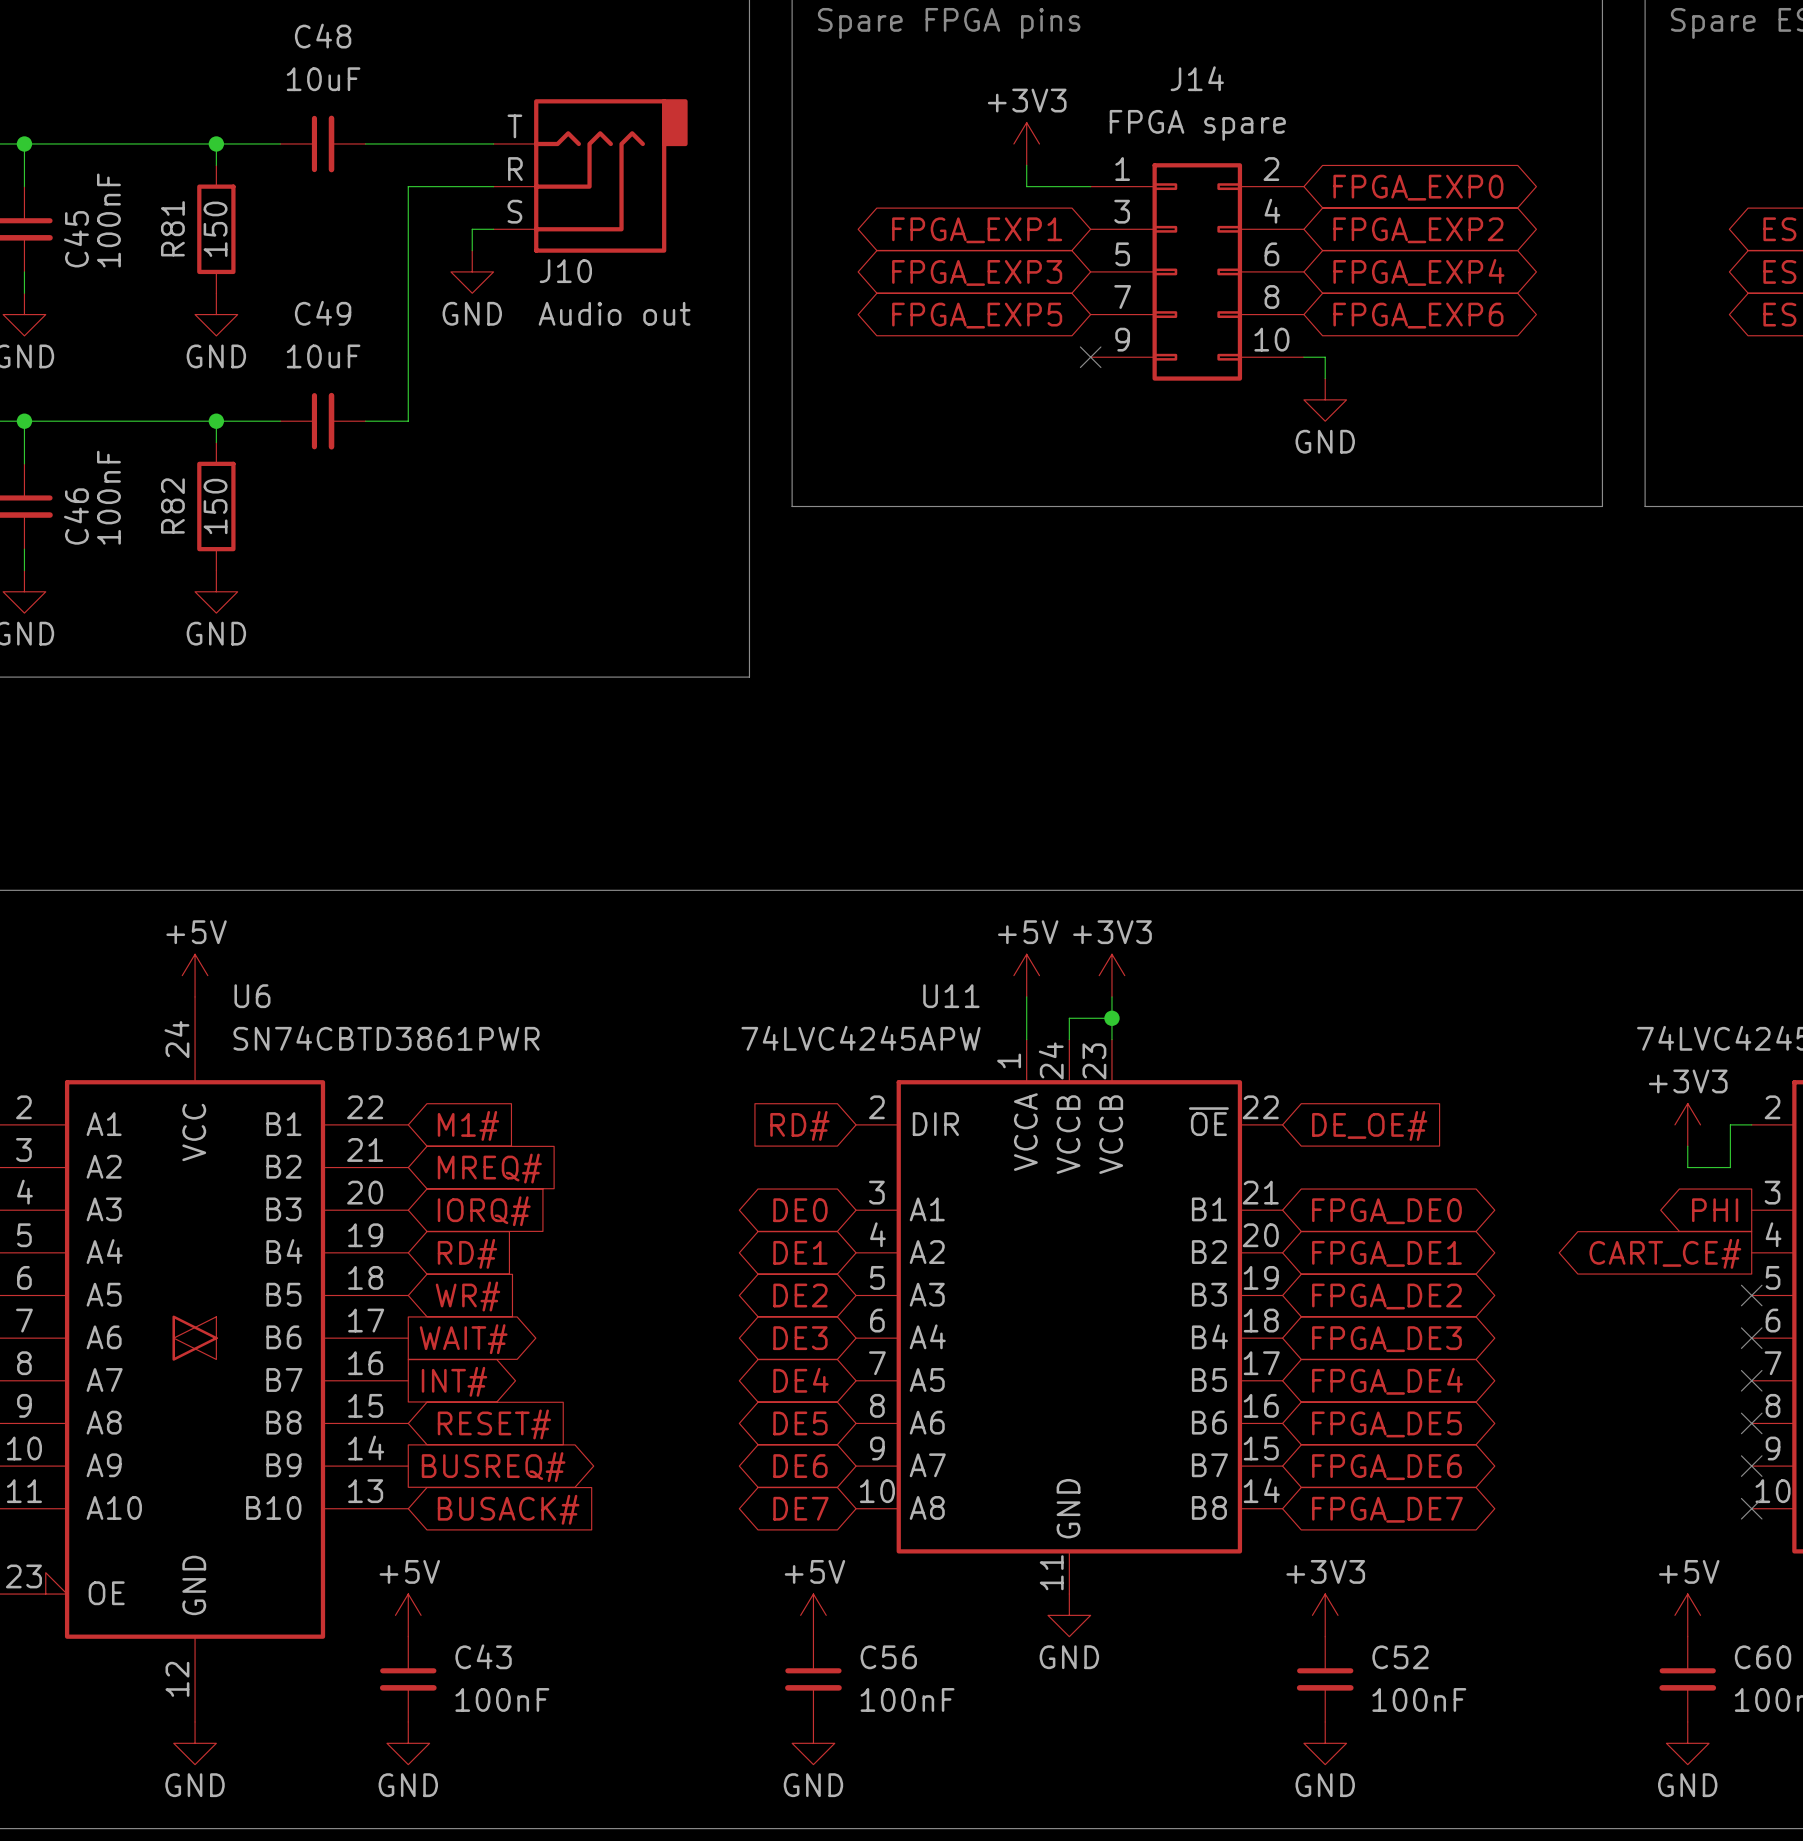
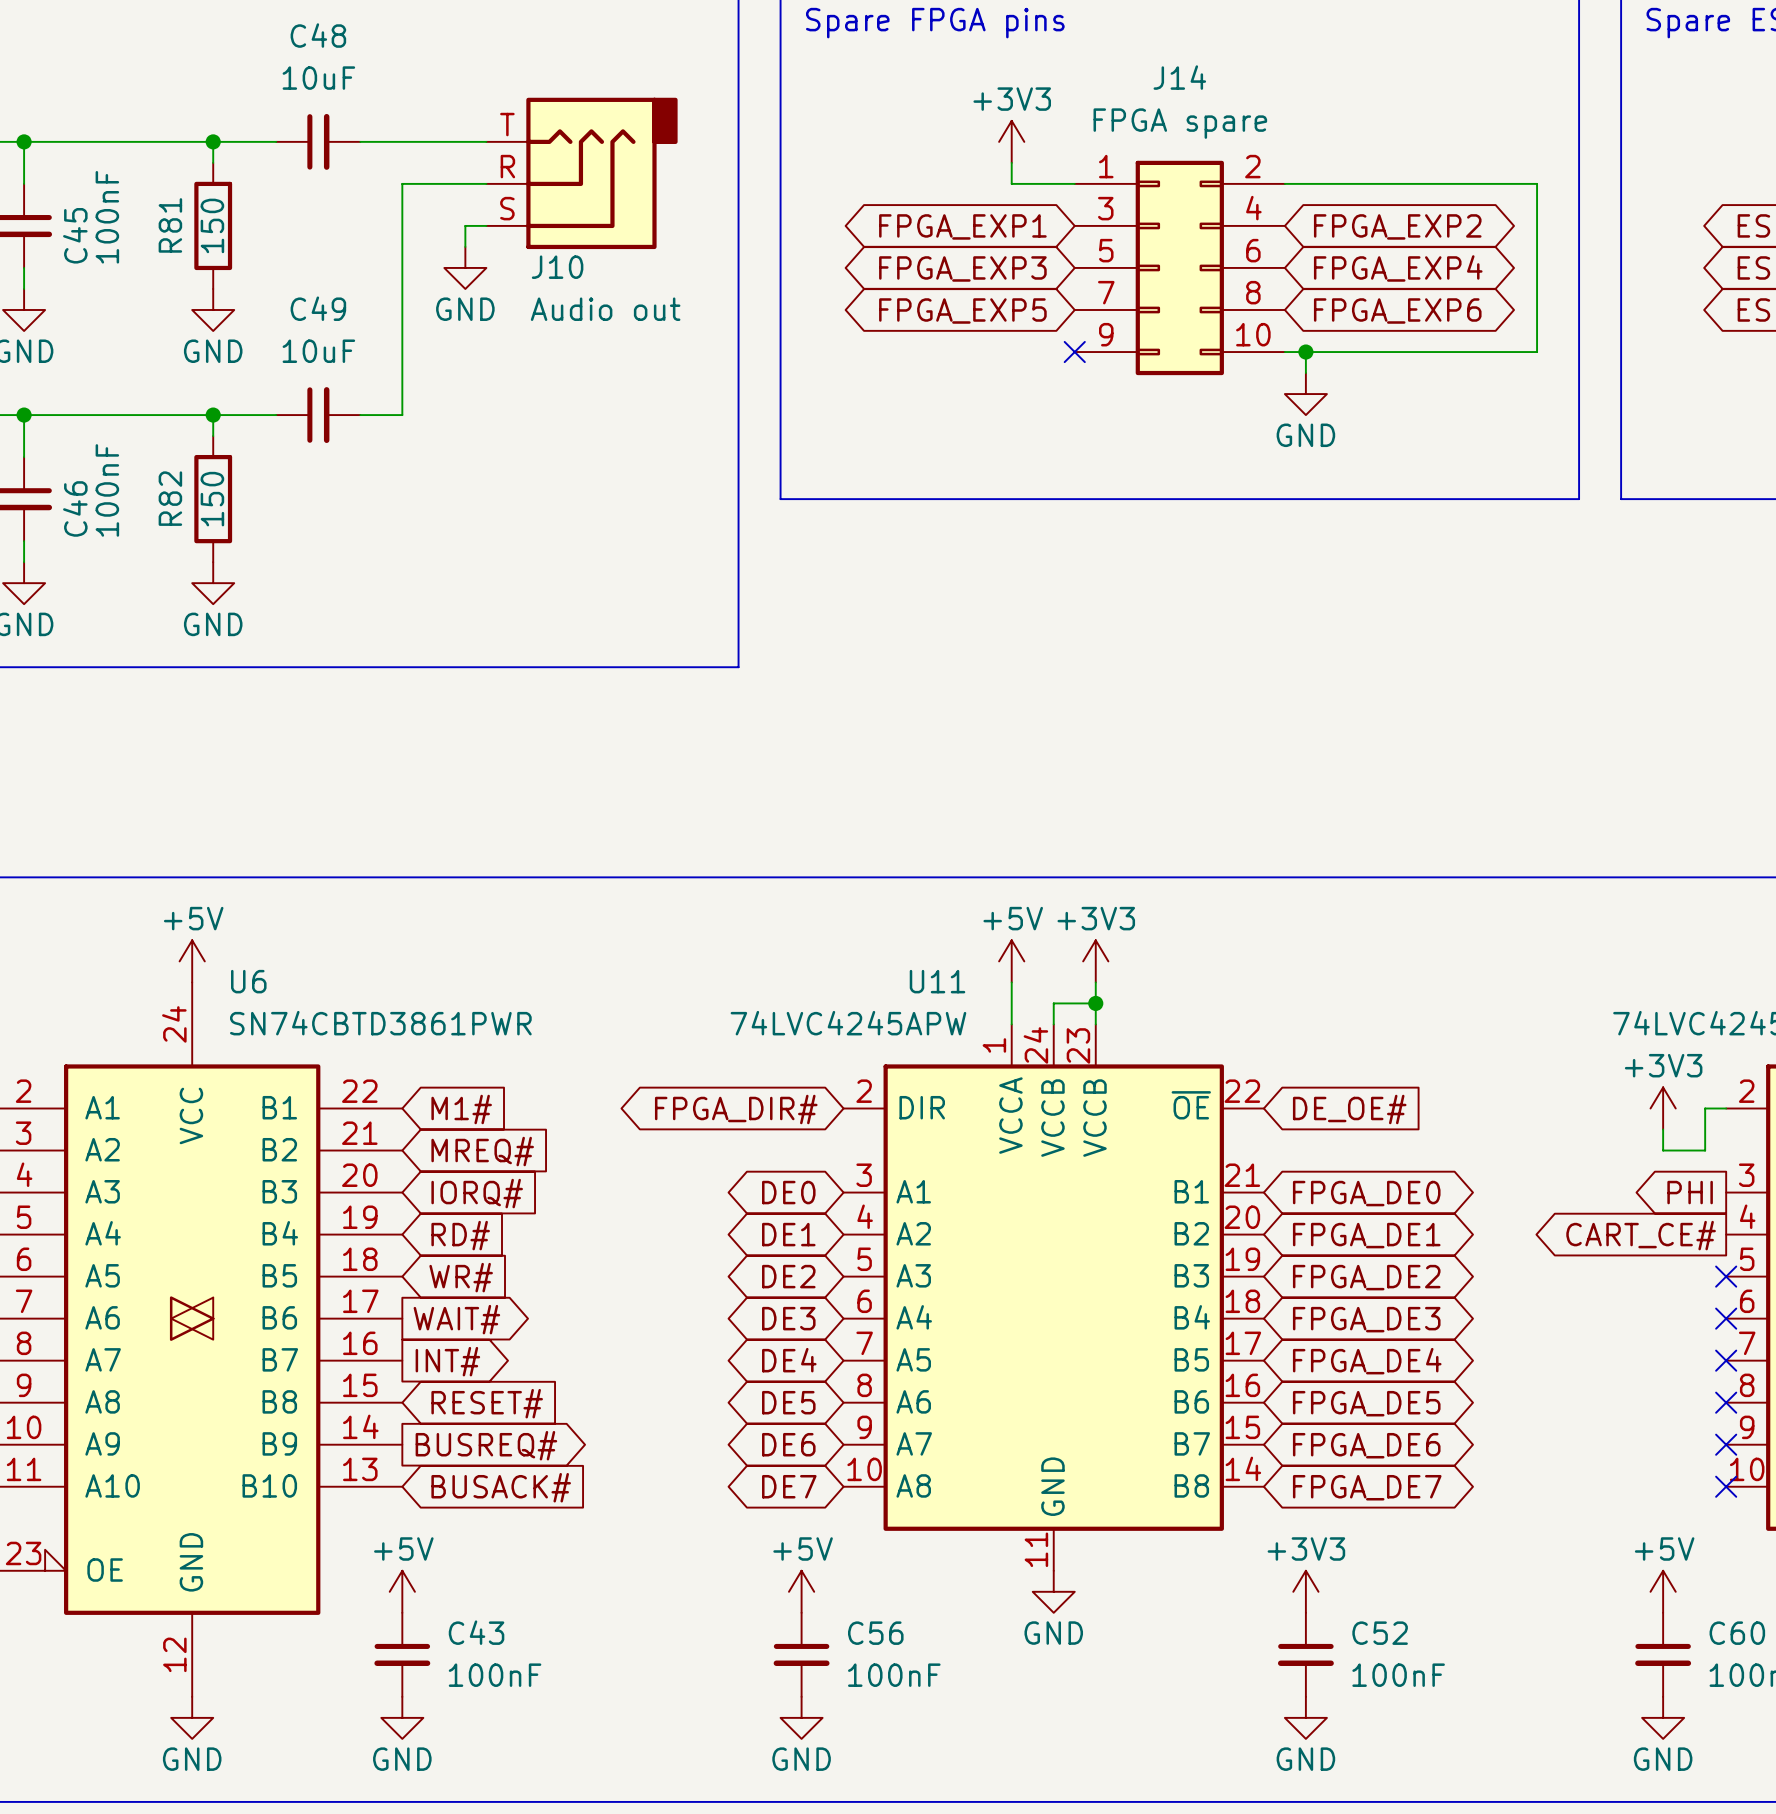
wire: none -> (1284, 183) (1537, 183) (1537, 352) (1305, 352)
global label: FPGA_EXP0 (1418, 187) -> none
junction: none -> (1305, 352)
global label shape: input (799, 1125) -> bidirectional (736, 1109)
global label: RD# (799, 1125) -> FPGA_DIR# (736, 1109)

